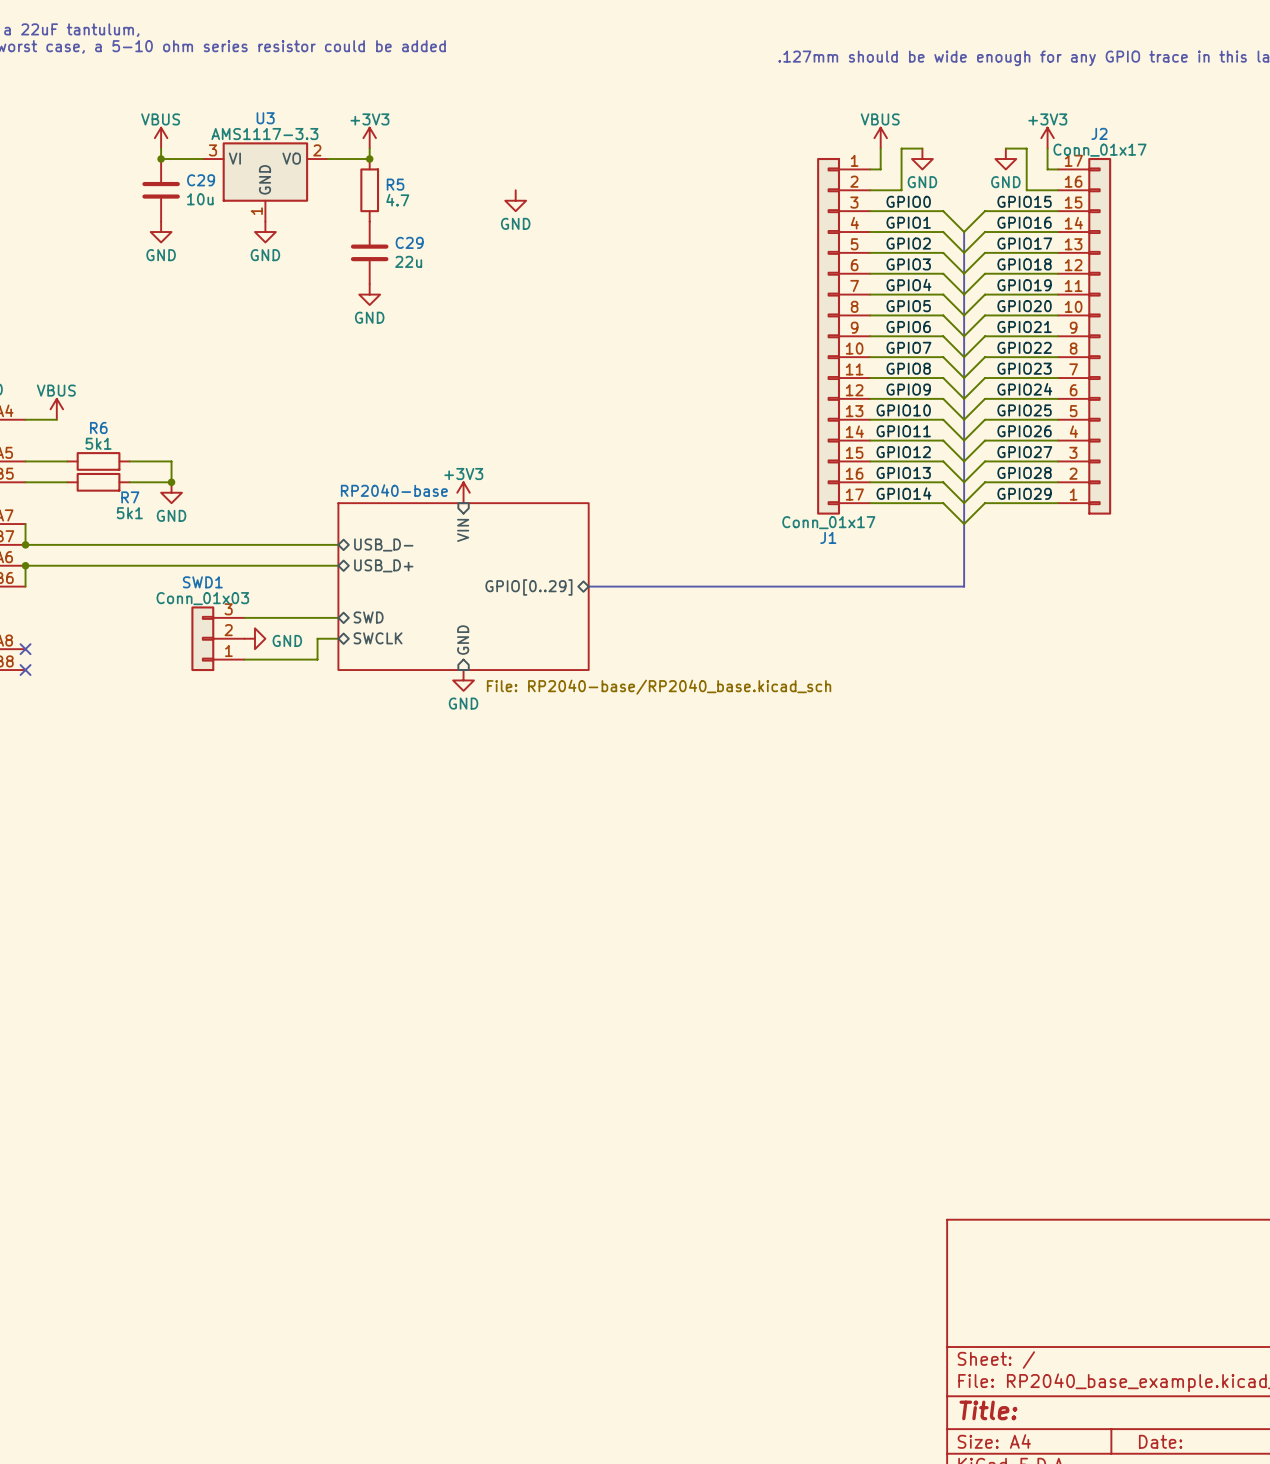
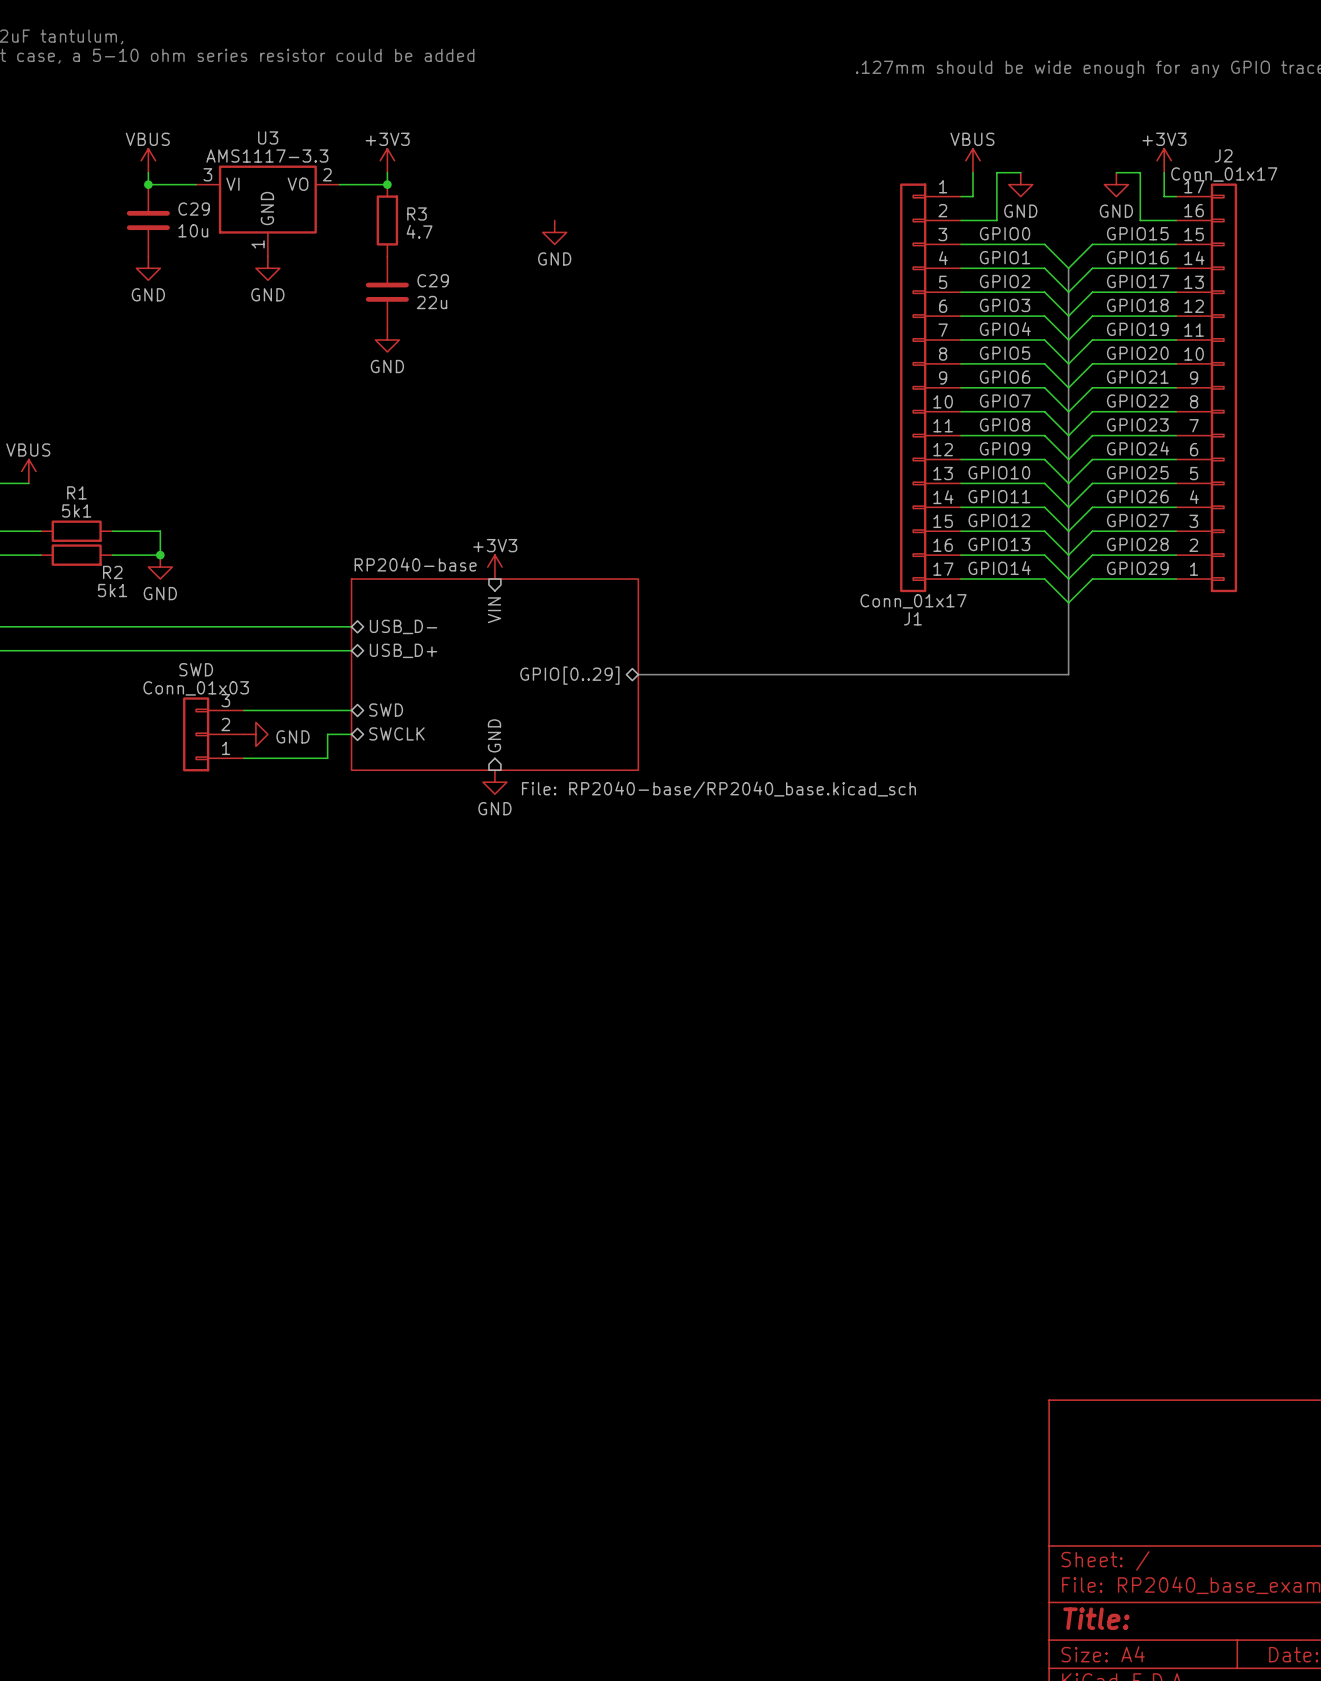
R5 name: R5 (395, 184) -> R3 (417, 213)
R6 name: R6 (98, 428) -> R1 (76, 492)
R7 name: R7 (130, 497) -> R2 (112, 572)
SWD1 name: SWD1 (202, 582) -> SWD (196, 669)

